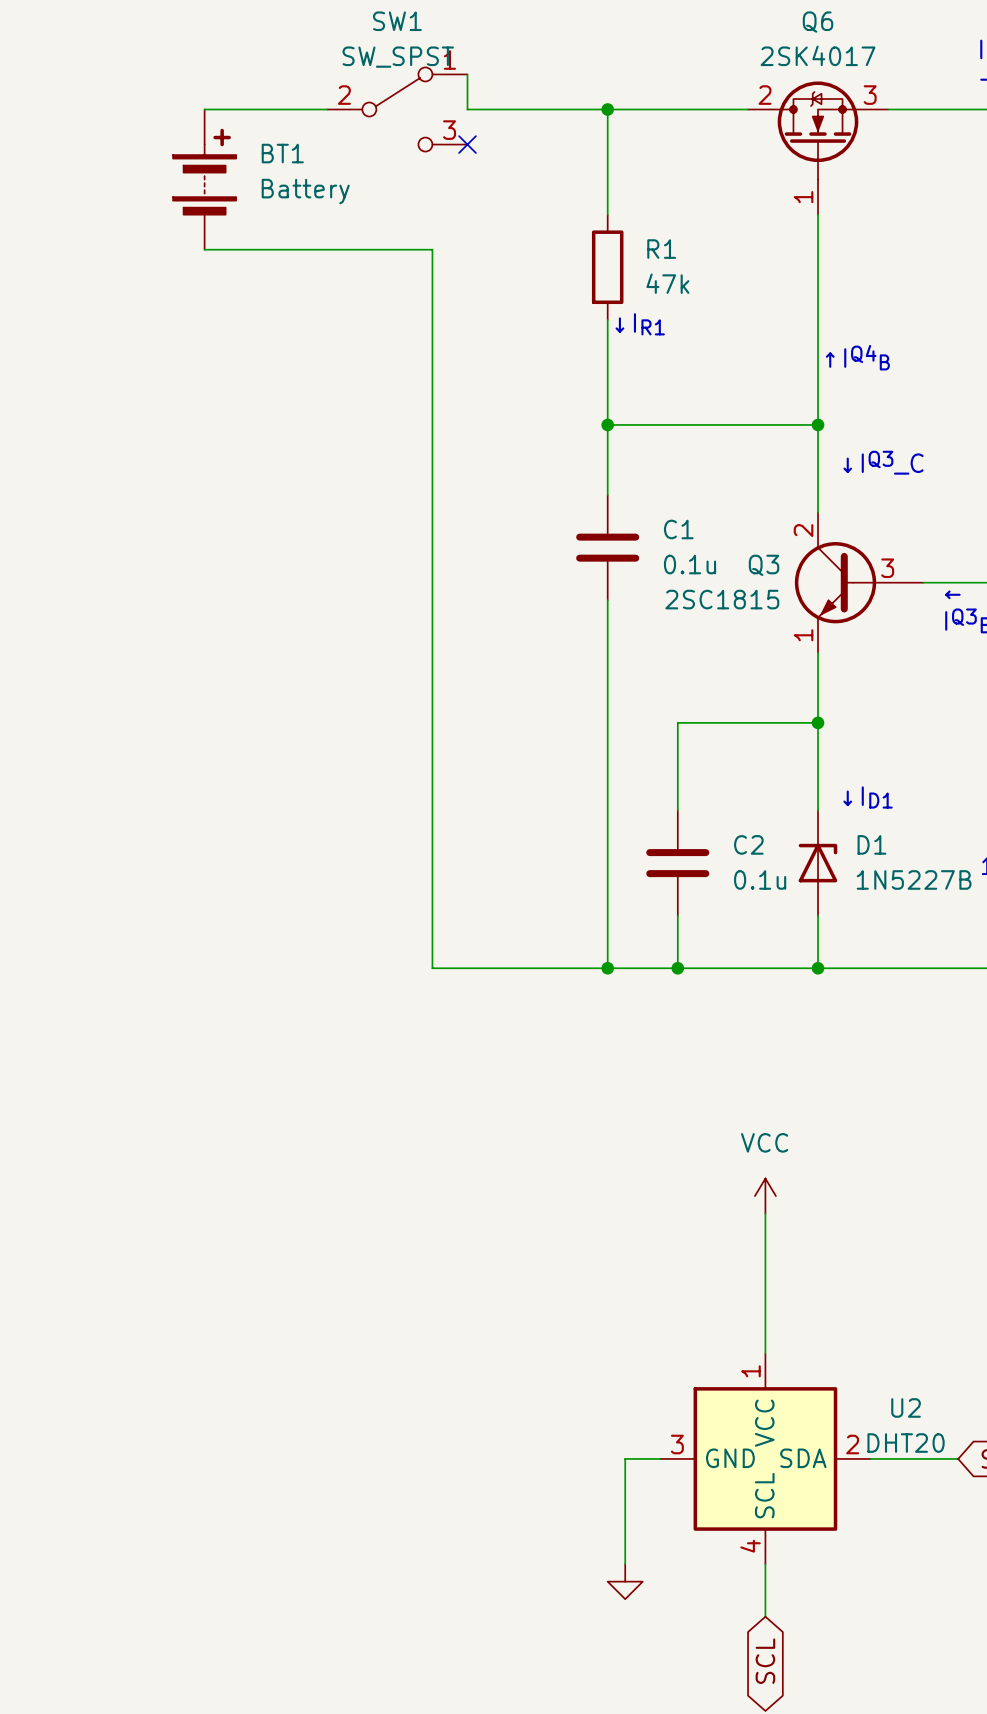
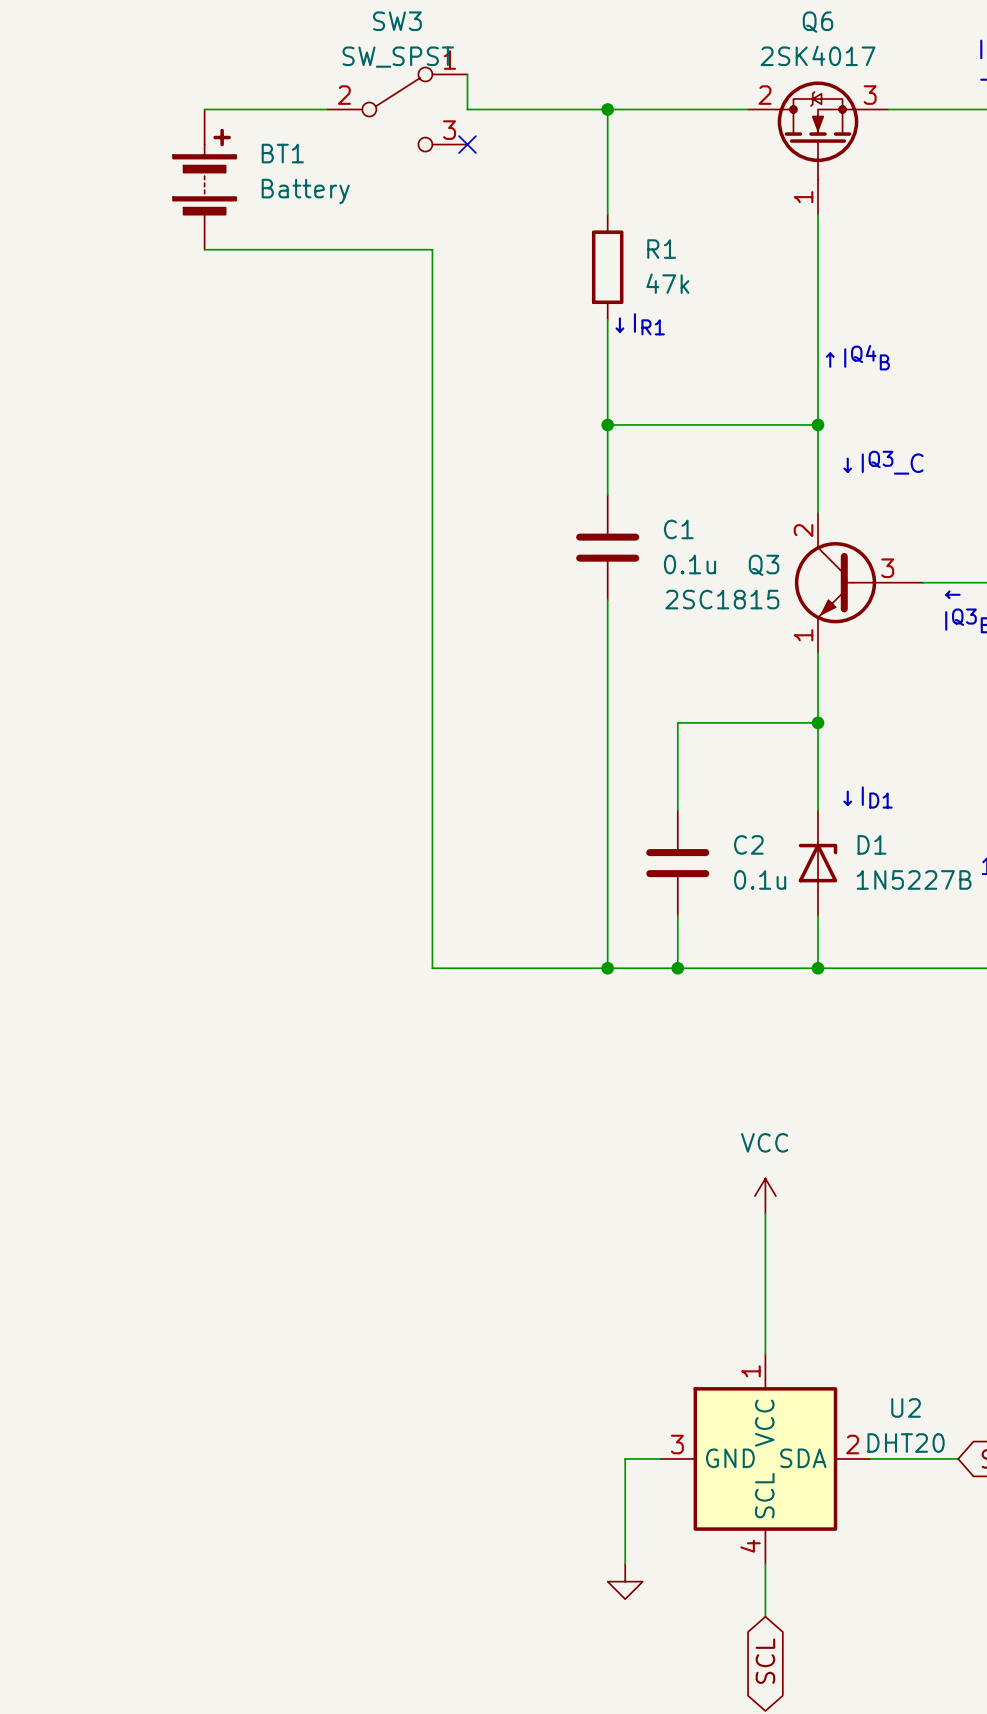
SW1 name: SW1 (397, 21) -> SW3 (397, 21)

